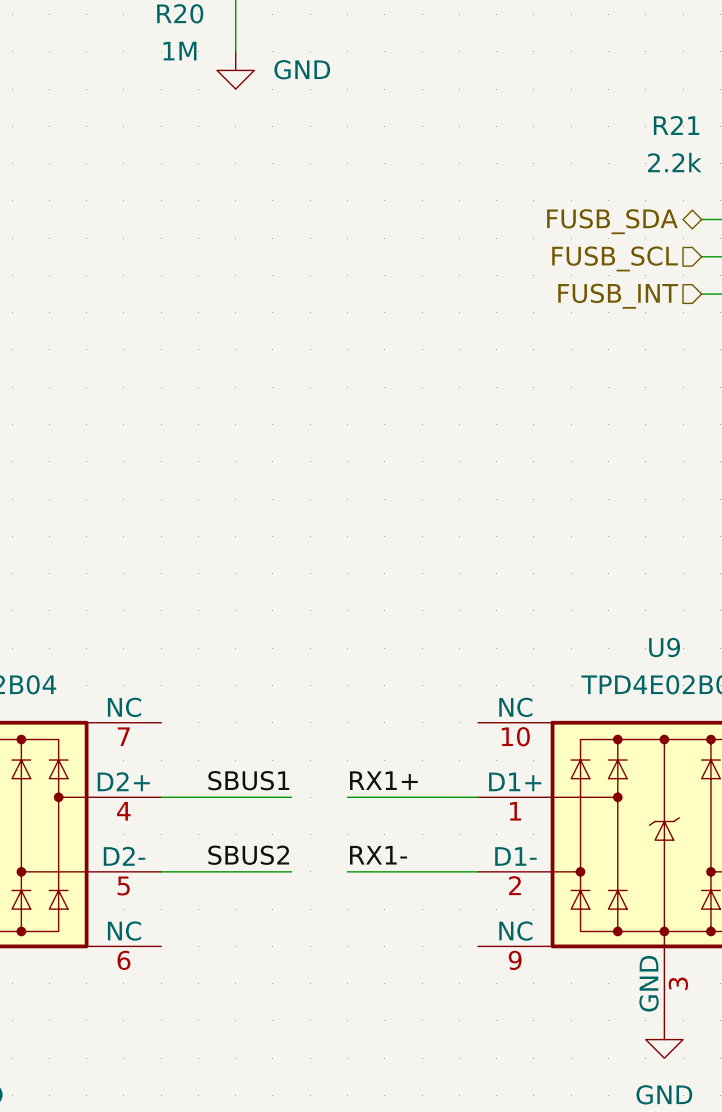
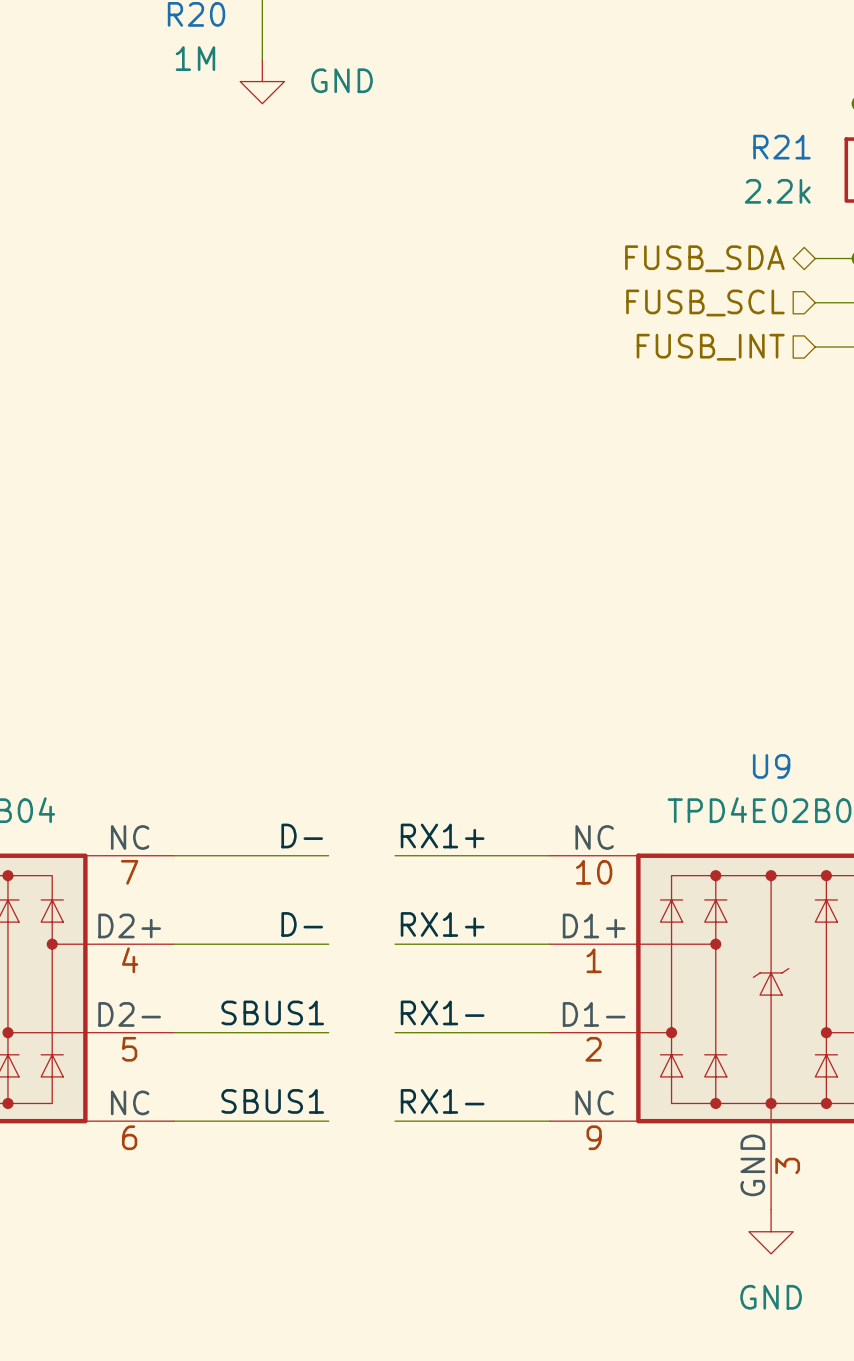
label: none -> D- (302, 835)
label: none -> RX1+ (442, 835)
wire: none -> (173, 855) (328, 855)
wire: none -> (395, 855) (549, 855)
label: SBUS1 (248, 780) -> D- (302, 924)
label: SBUS2 (248, 855) -> SBUS1 (272, 1012)
label: none -> SBUS1 (272, 1101)
label: none -> RX1- (442, 1101)
wire: none -> (173, 1121) (328, 1121)
wire: none -> (395, 1121) (549, 1121)

